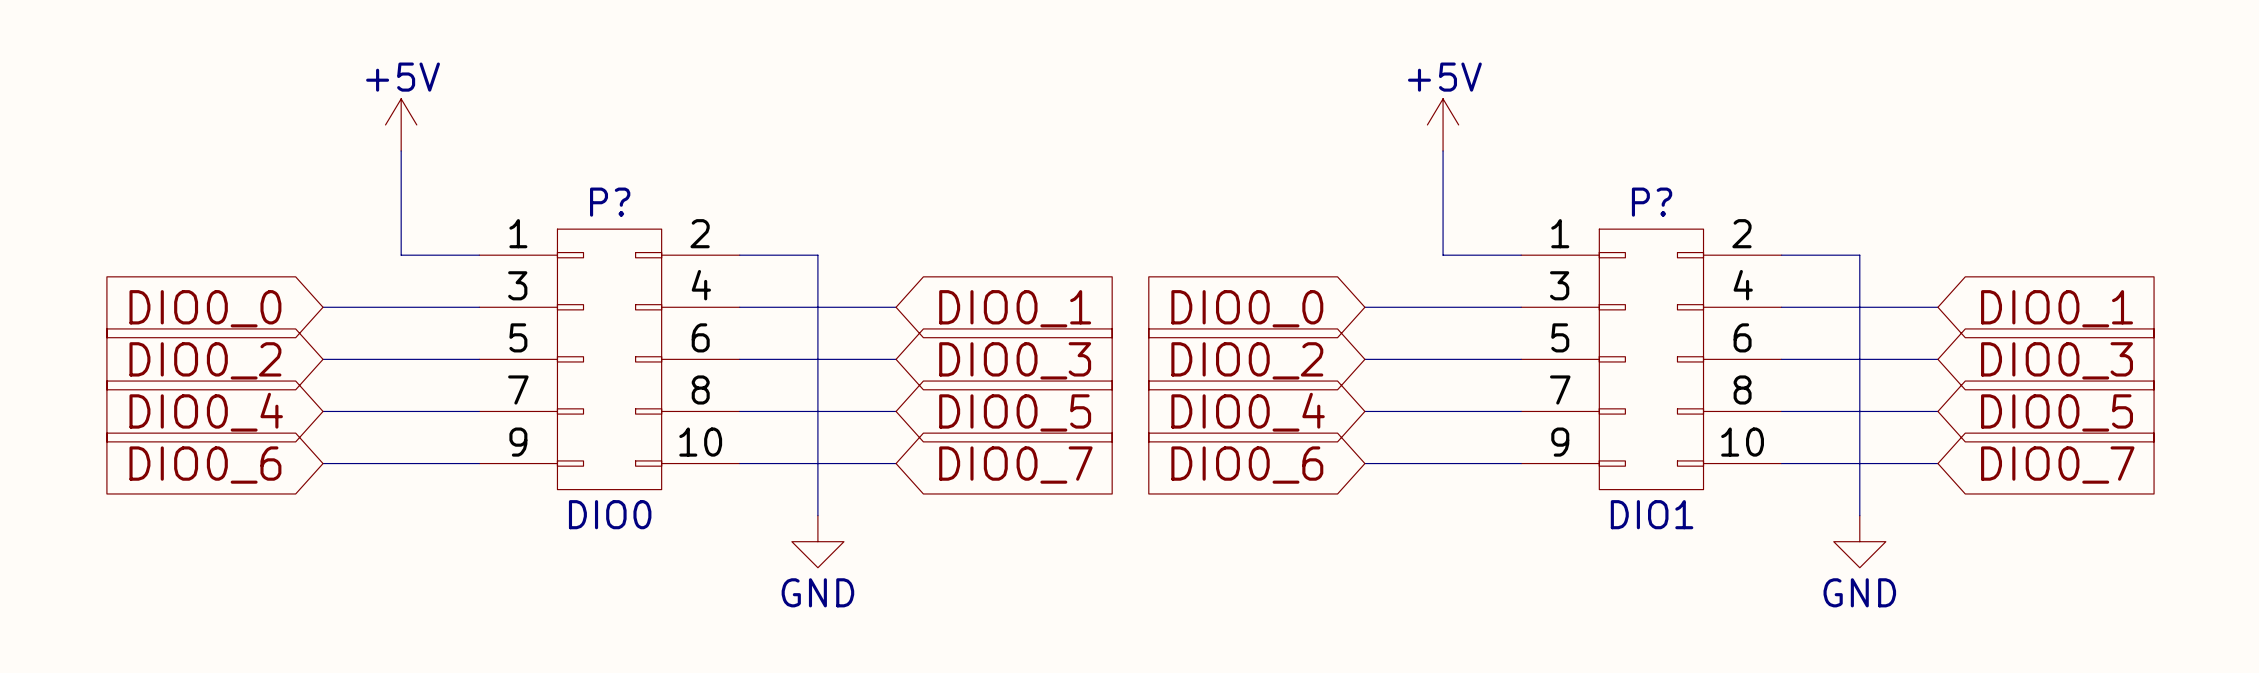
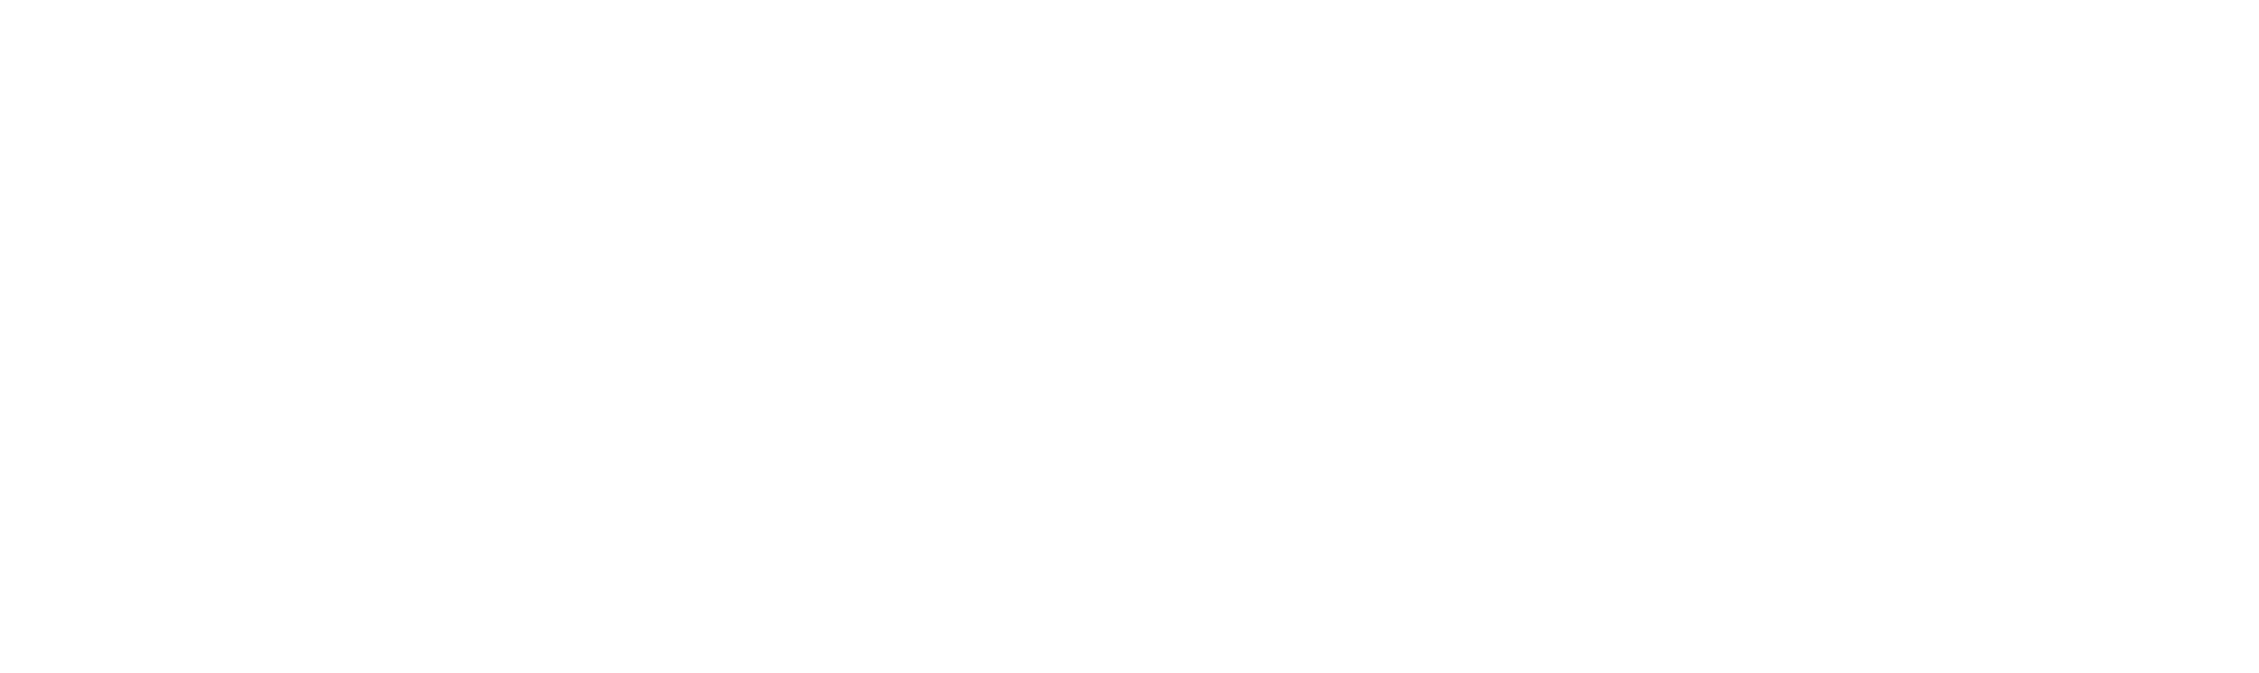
power symbol: +5V (401, 124) -> none
power symbol: +5V (1443, 124) -> none
wire: (401, 150) (401, 255) (479, 255) -> none
wire: (1443, 150) (1443, 255) (1521, 255) -> none
wire: (739, 255) (817, 255) (817, 515) -> none
wire: (1781, 255) (1859, 255) (1859, 515) -> none
wire: (323, 307) (479, 307) -> none
wire: (739, 307) (896, 307) -> none
wire: (1364, 307) (1521, 307) -> none
wire: (1781, 307) (1937, 307) -> none
global label: DIO0_0 (205, 308) -> none
global label: DIO0_1 (1015, 308) -> none
global label: DIO0_0 (1247, 308) -> none
global label: DIO0_1 (2057, 308) -> none
wire: (323, 359) (479, 359) -> none
P?: DIO0 (609, 359) -> none
wire: (739, 359) (896, 359) -> none
wire: (1364, 359) (1521, 359) -> none
P?: DIO1 (1651, 359) -> none
wire: (1781, 359) (1937, 359) -> none
global label: DIO0_2 (205, 360) -> none
global label: DIO0_3 (1015, 360) -> none
global label: DIO0_2 (1247, 360) -> none
global label: DIO0_3 (2057, 360) -> none
wire: (323, 411) (479, 411) -> none
wire: (739, 411) (896, 411) -> none
wire: (1364, 411) (1521, 411) -> none
wire: (1781, 411) (1937, 411) -> none
global label: DIO0_4 (206, 412) -> none
global label: DIO0_5 (1015, 412) -> none
global label: DIO0_4 (1248, 412) -> none
global label: DIO0_5 (2057, 412) -> none
wire: (323, 463) (479, 463) -> none
wire: (739, 463) (896, 463) -> none
wire: (1364, 463) (1521, 463) -> none
wire: (1781, 463) (1937, 463) -> none
global label: DIO0_6 (205, 465) -> none
global label: DIO0_7 (1015, 465) -> none
global label: DIO0_6 (1247, 465) -> none
global label: DIO0_7 (2057, 465) -> none
power symbol: GND (817, 541) -> none
power symbol: GND (1859, 541) -> none

